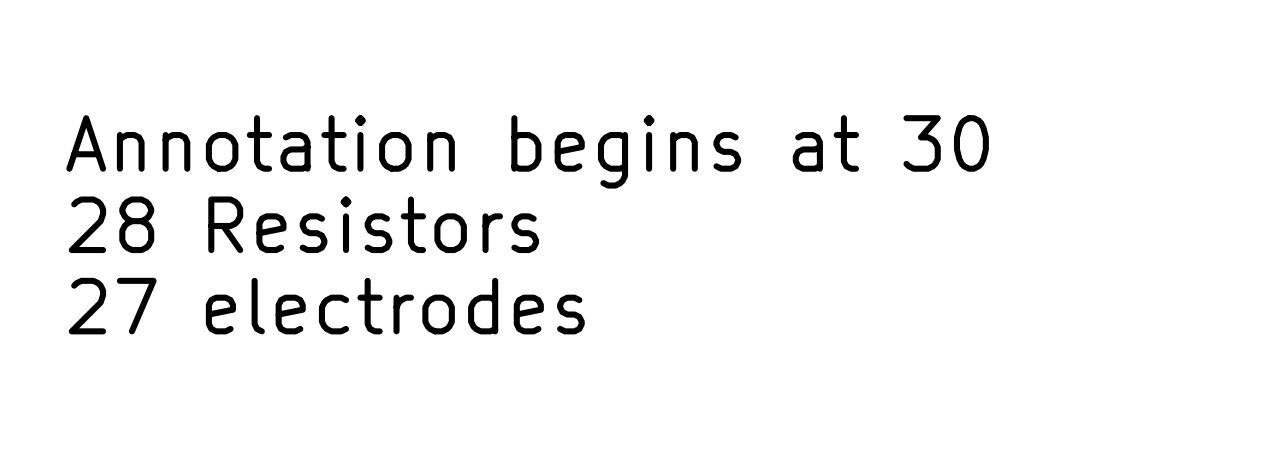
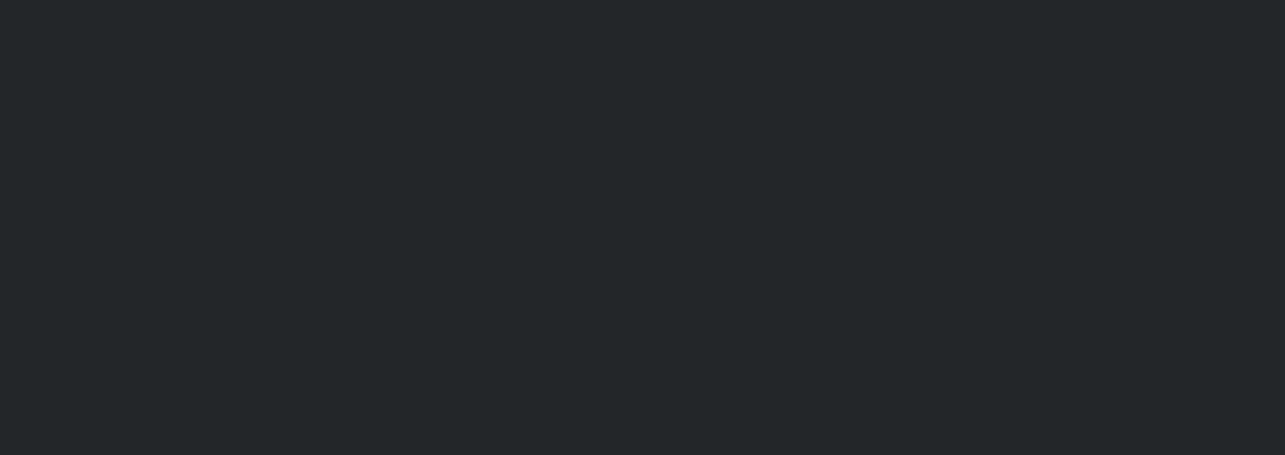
text: Annotation begins at 30 (527, 151) -> none
text: 28 Resistors (303, 224) -> none
text: 27 electrodes (326, 306) -> none

